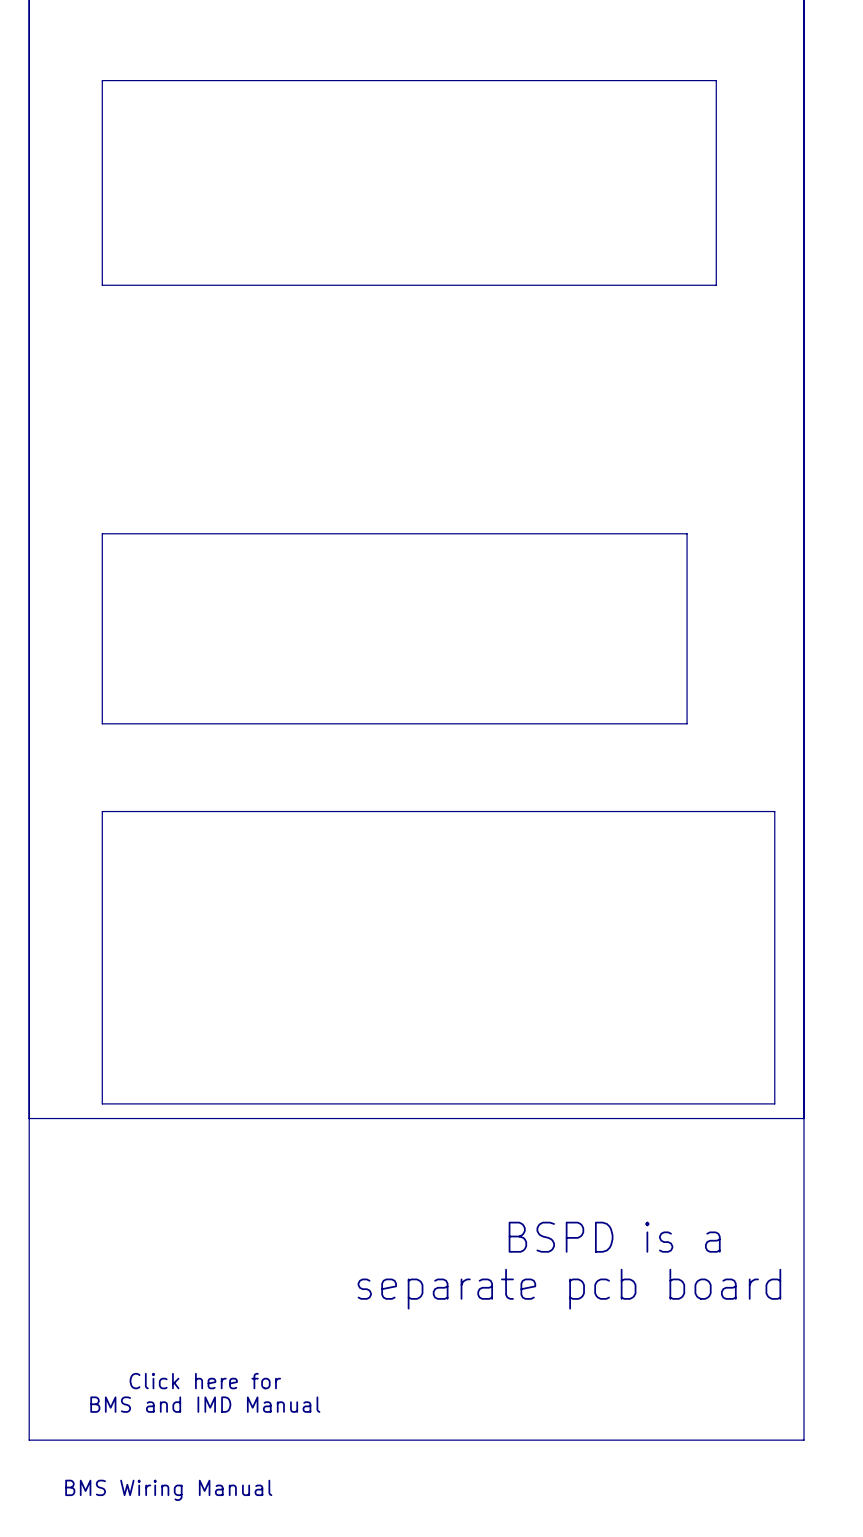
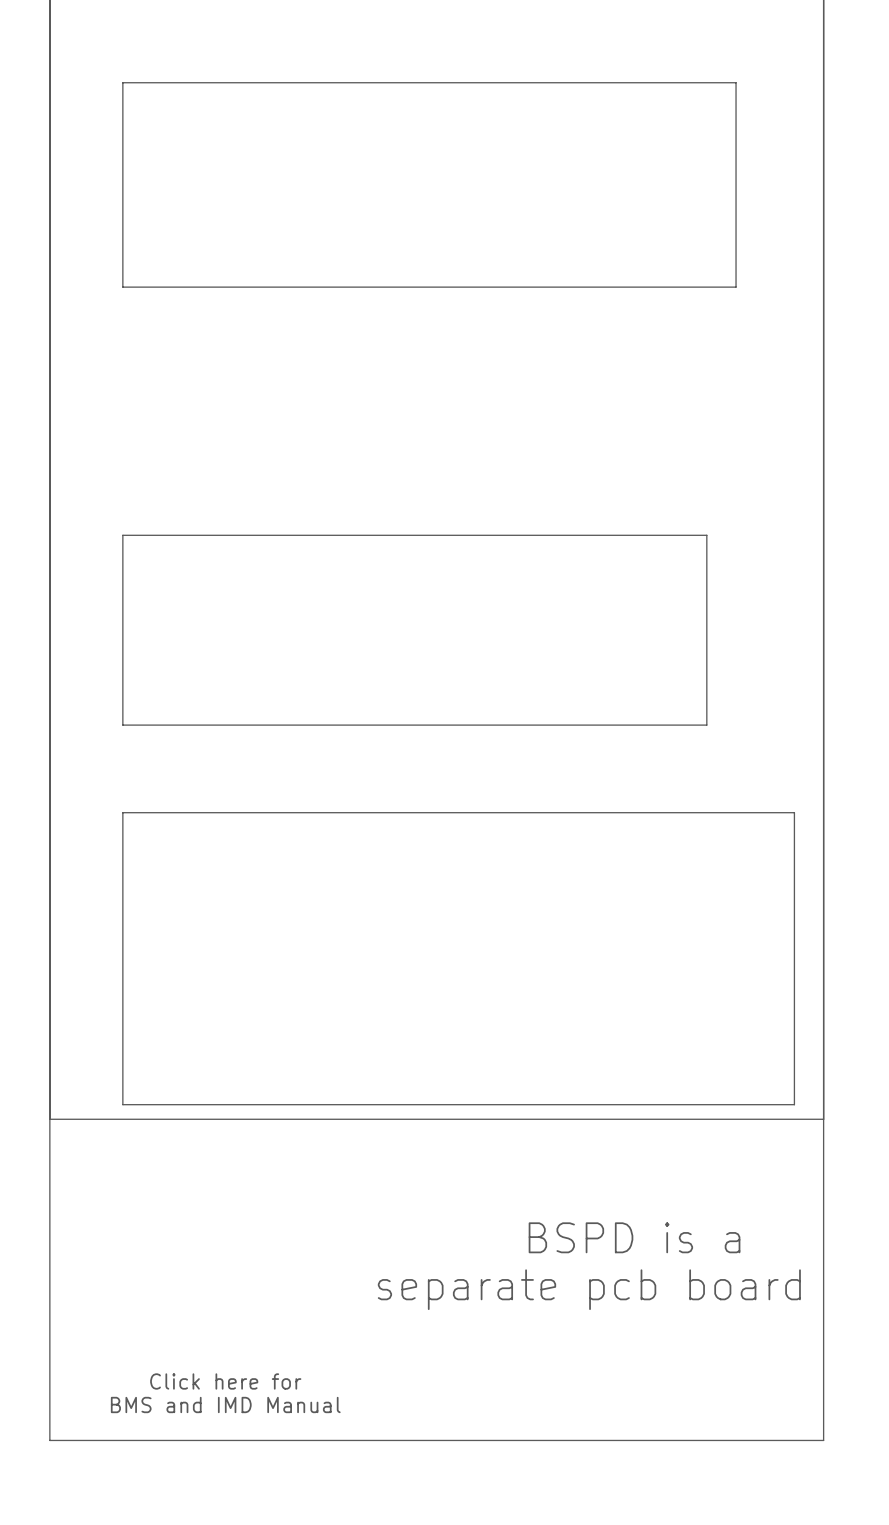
text: BMS Wiring Manual (168, 1490) -> none

